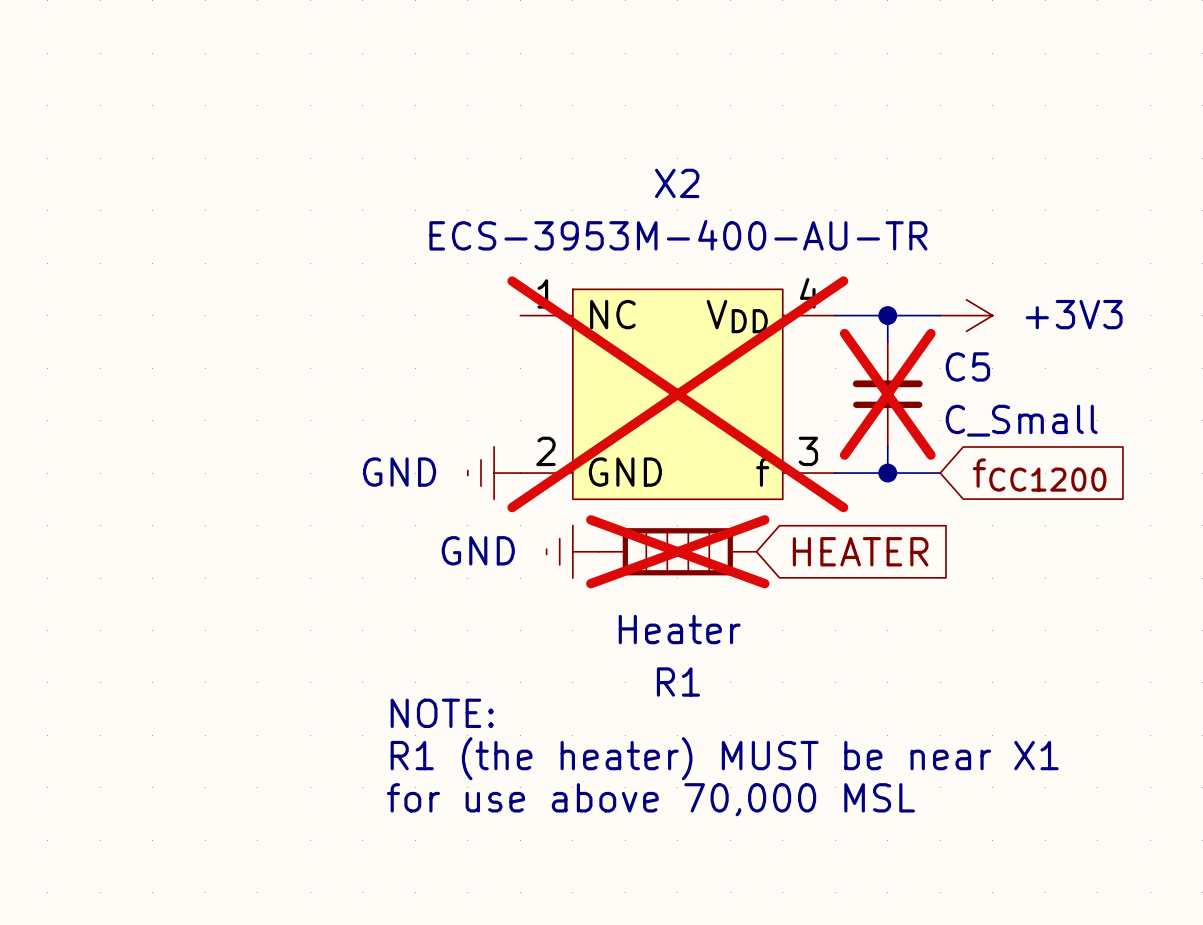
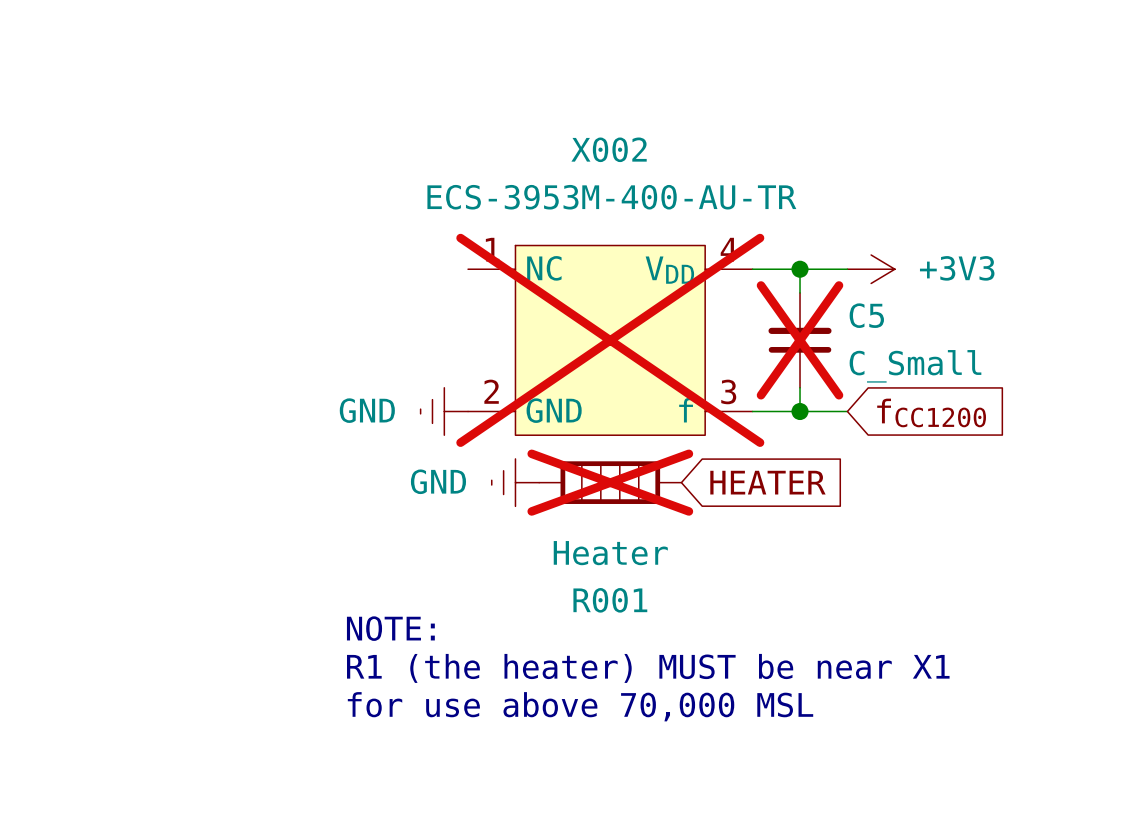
X2 name: X2 (677, 183) -> X002 (609, 149)
R1 name: R1 (678, 682) -> R001 (610, 600)

